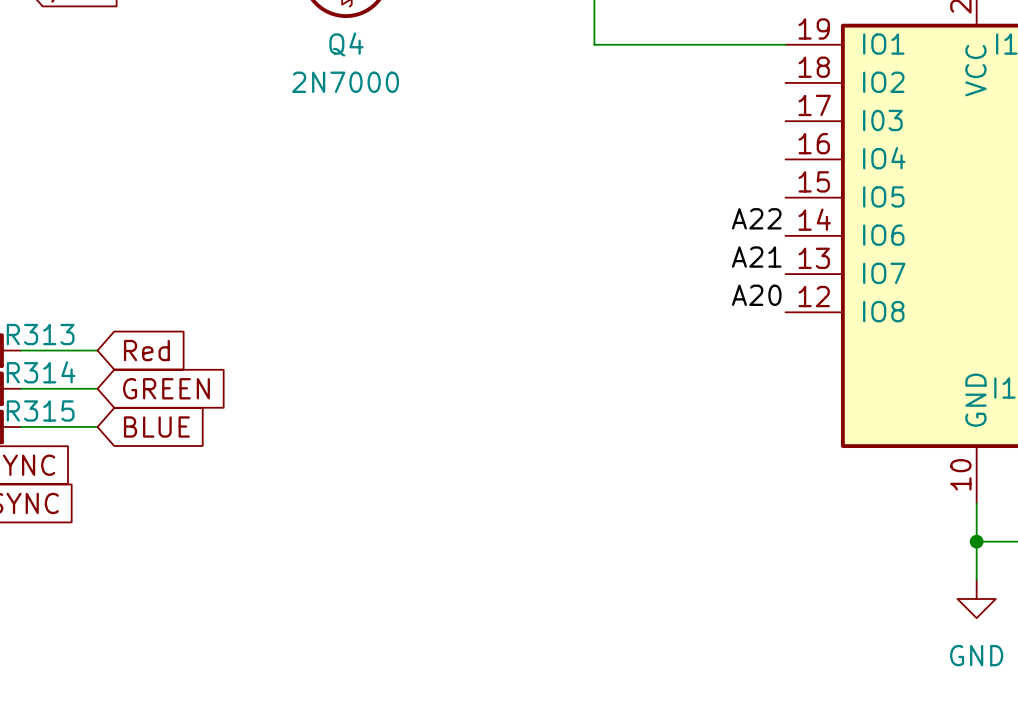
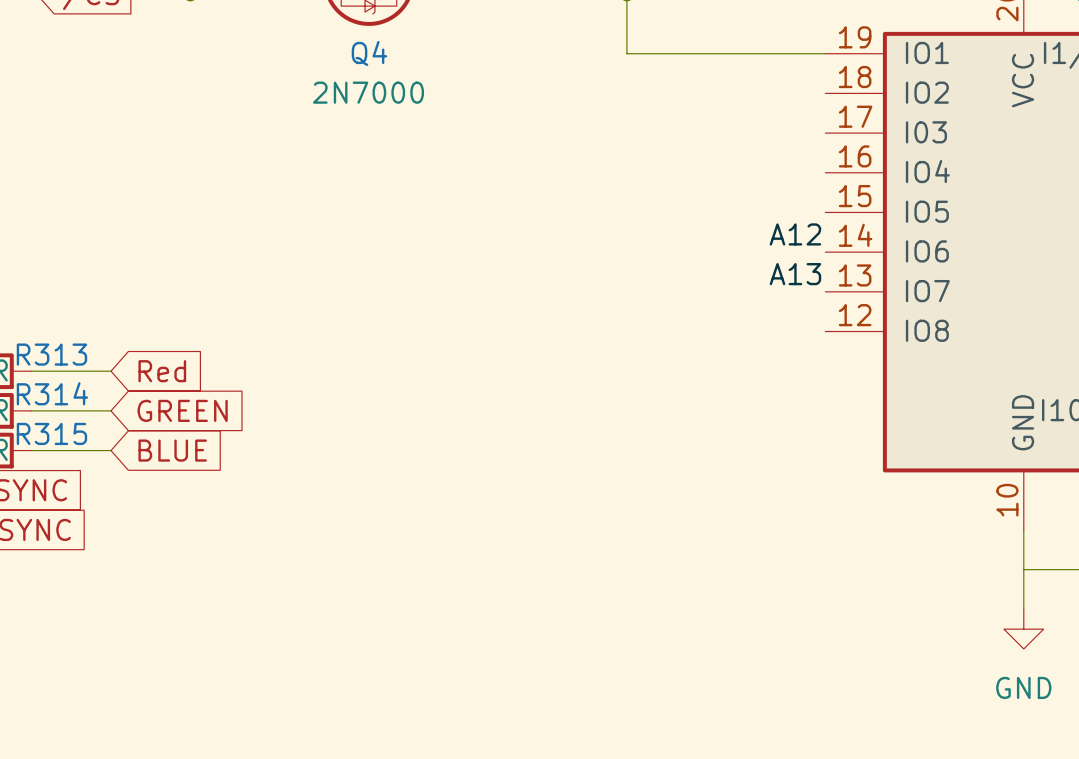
label: A22 (756, 218) -> A12 (795, 234)
label: A21 (756, 257) -> A13 (795, 274)
label: A20 (756, 295) -> none
junction: (976, 541) -> none

